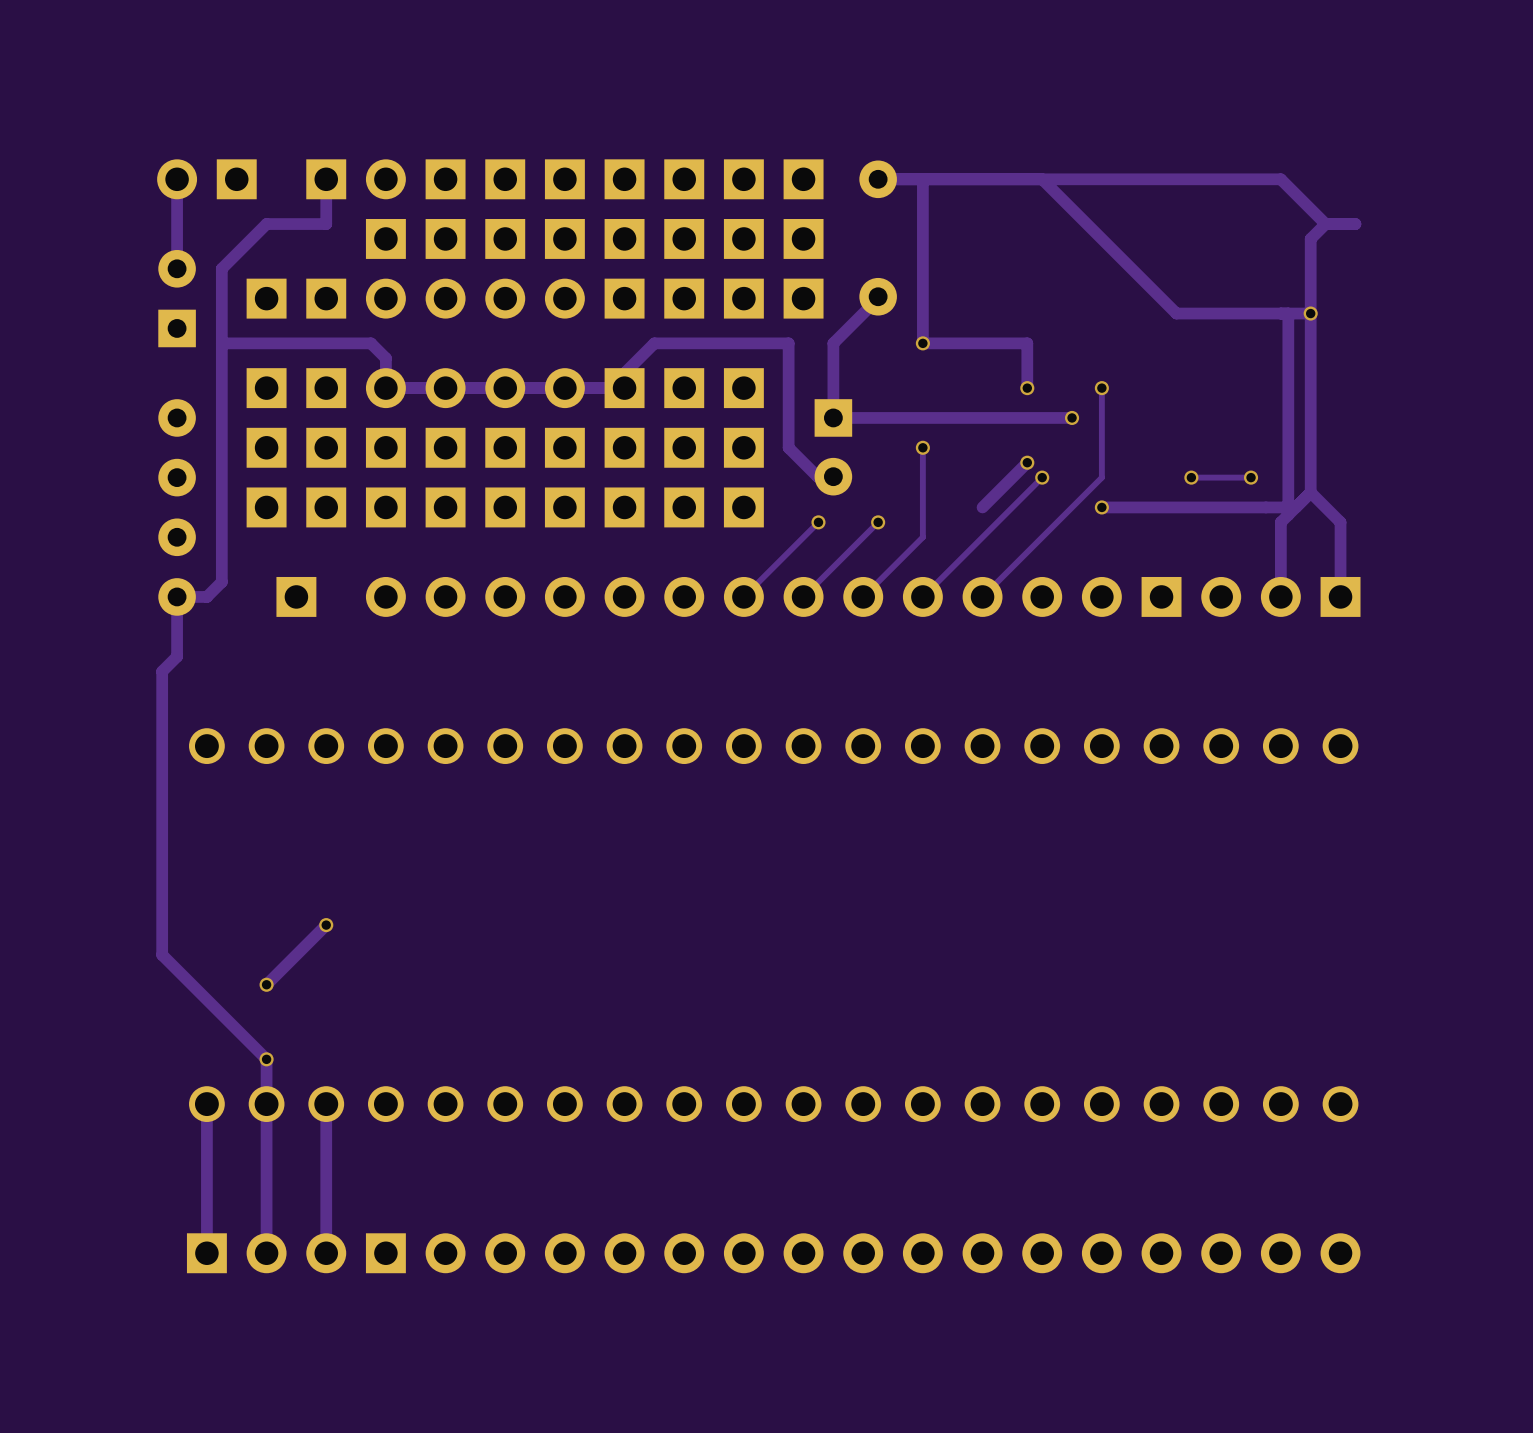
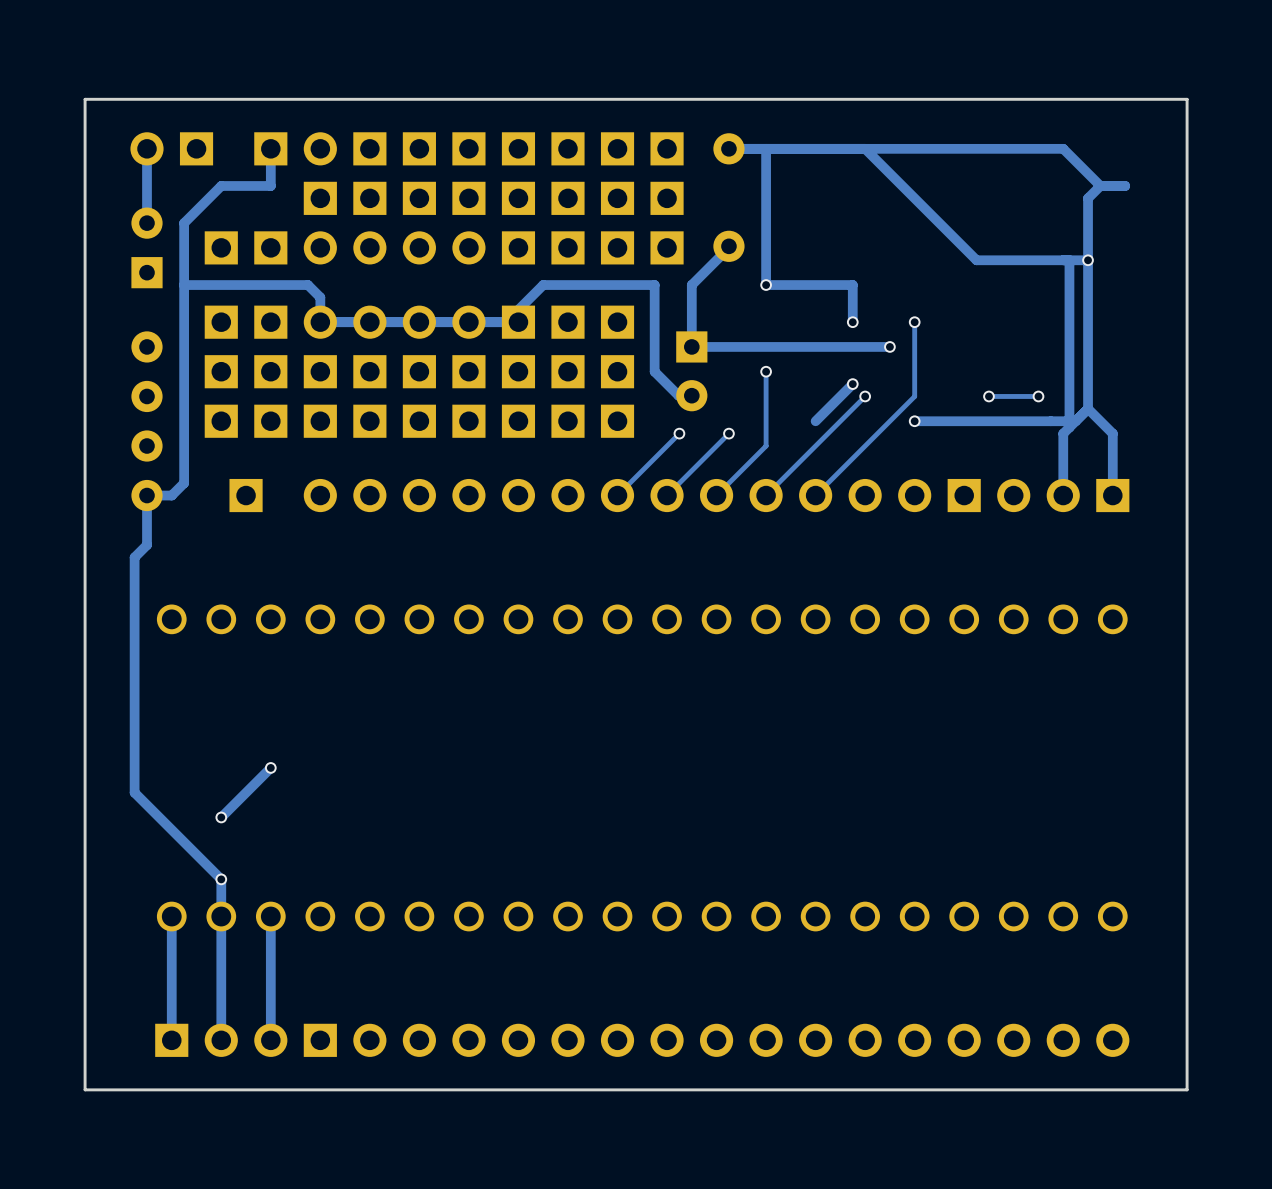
board edge: none -> (1187, 99) (1187, 1089) (85, 1089) (85, 99) (1187, 99)

